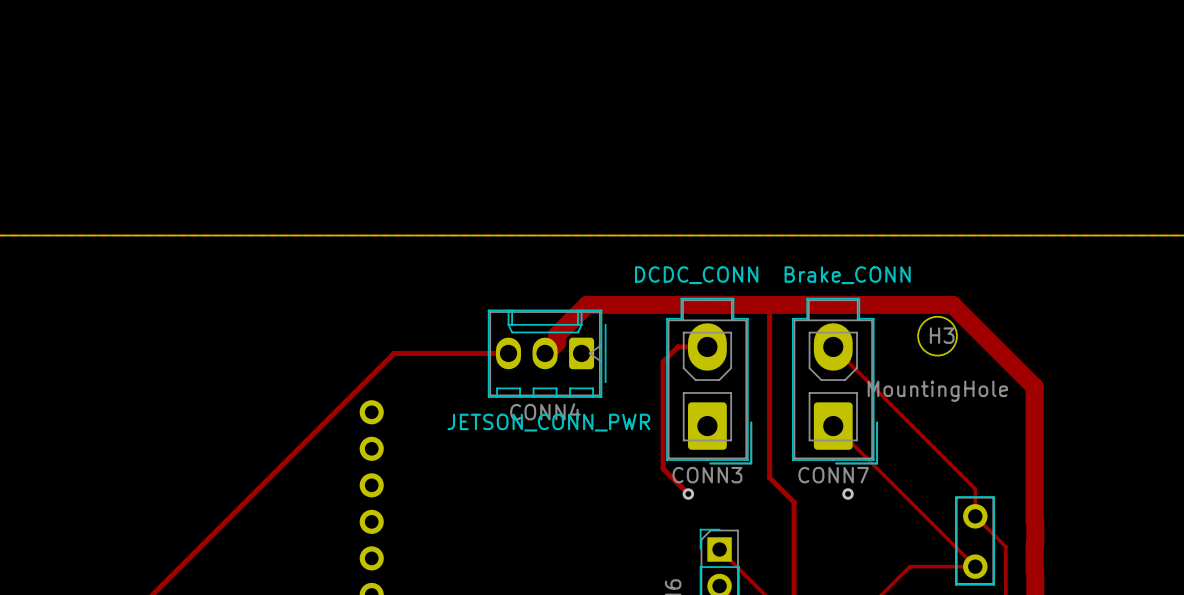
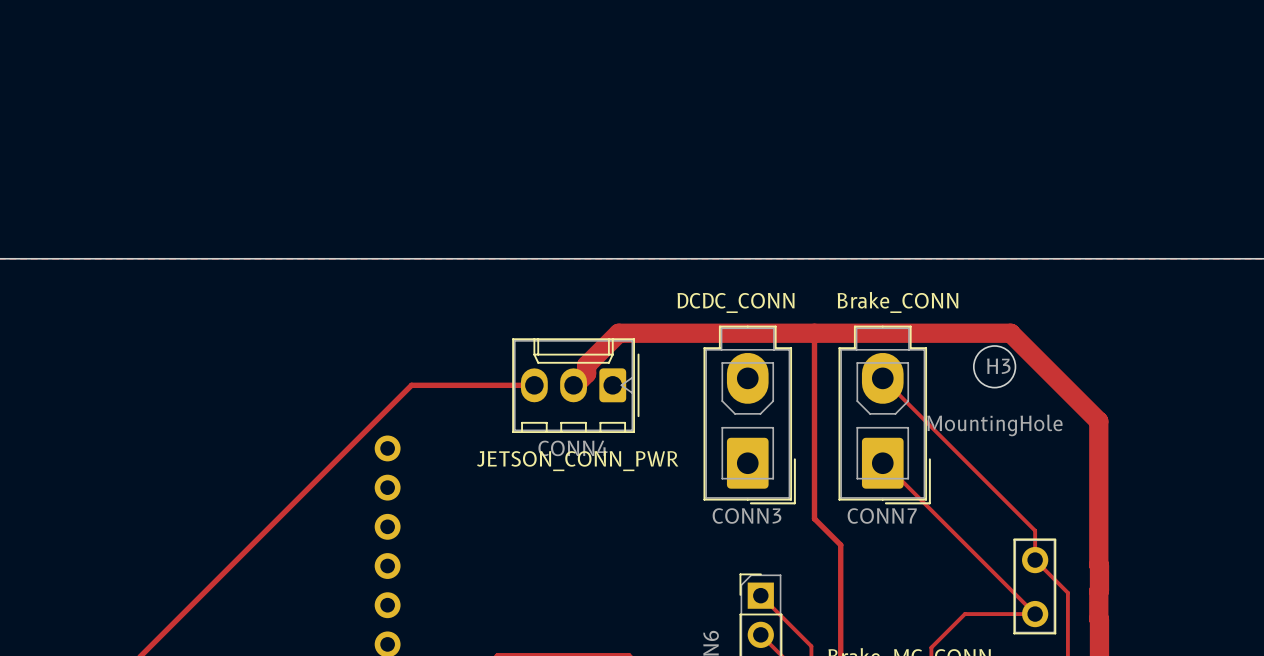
track: (707, 346) (677, 346) (663, 361) (663, 468) (688, 494) -> none
via: (688, 494) -> none
via: (848, 494) -> none

